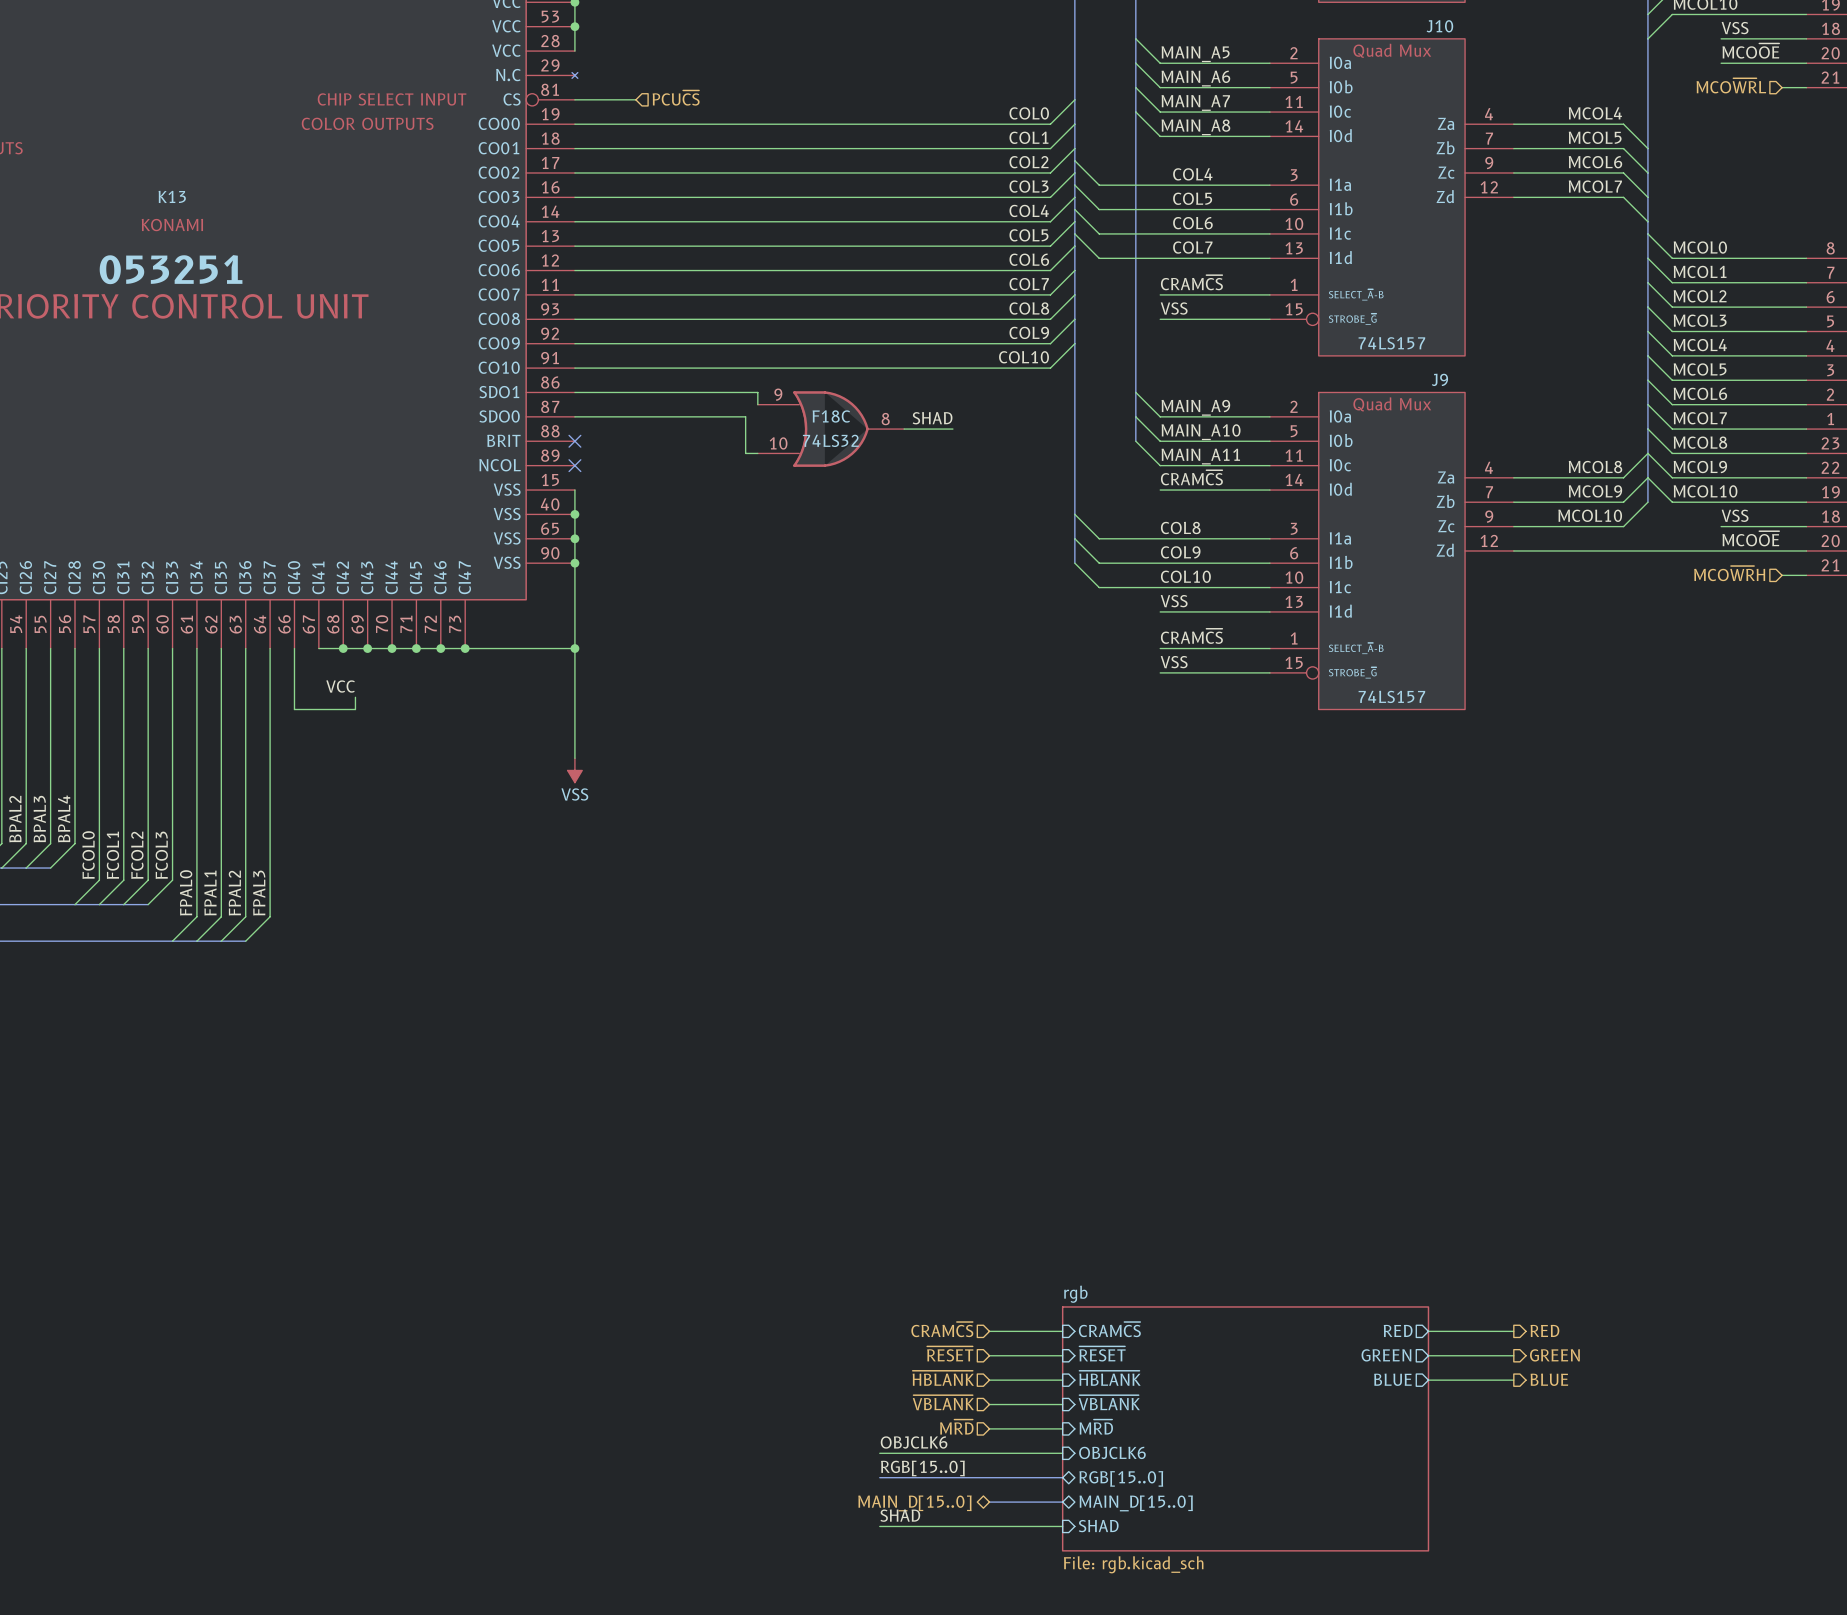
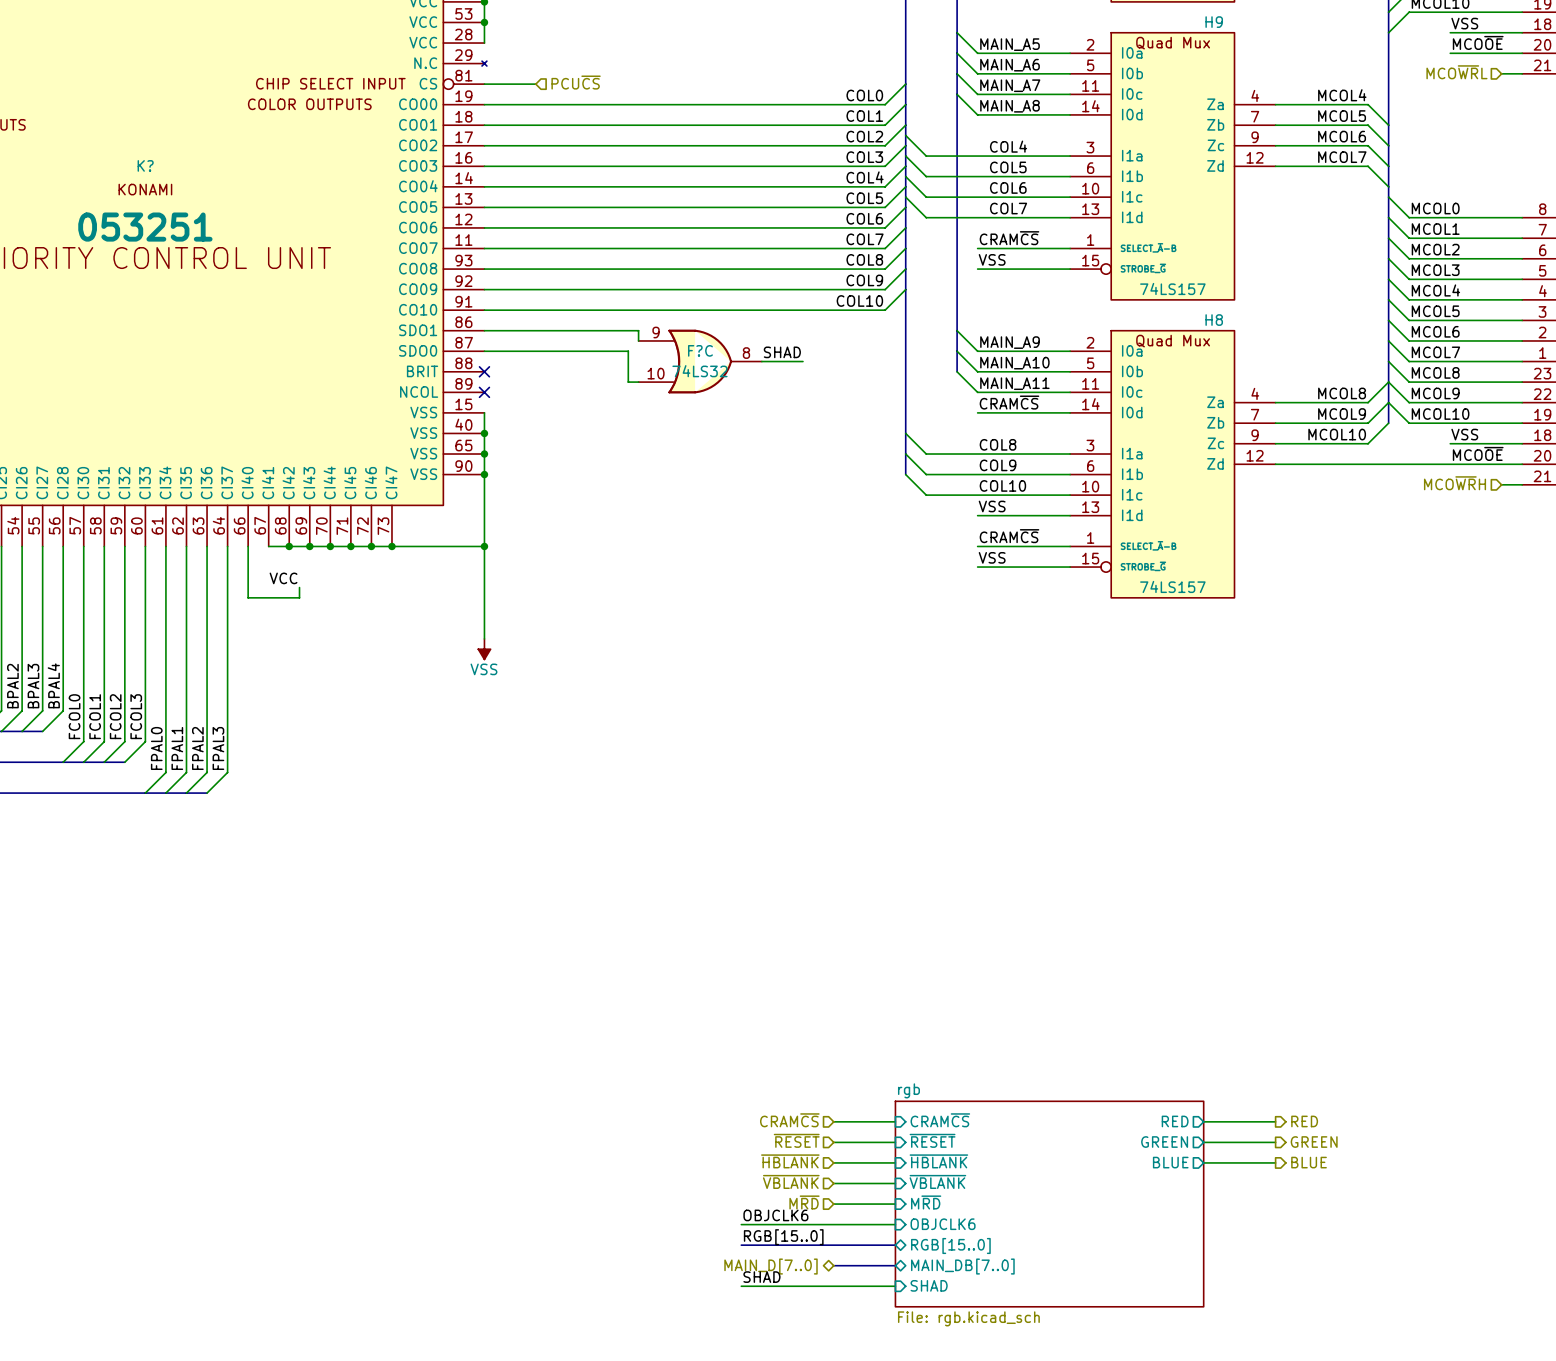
J10 name: J10 (1439, 26) -> H9 (1214, 22)
K13 name: K13 (172, 196) -> K? (145, 165)
J9 name: J9 (1439, 379) -> H8 (1214, 320)
F18C name: F18C (831, 416) -> F?C (700, 350)
hierarchical label: MAIN_D[15..0] (914, 1503) -> MAIN_D[7..0] (771, 1266)
sheet pin: MAIN_D[15..0] (1136, 1503) -> MAIN_DB[7..0] (962, 1266)

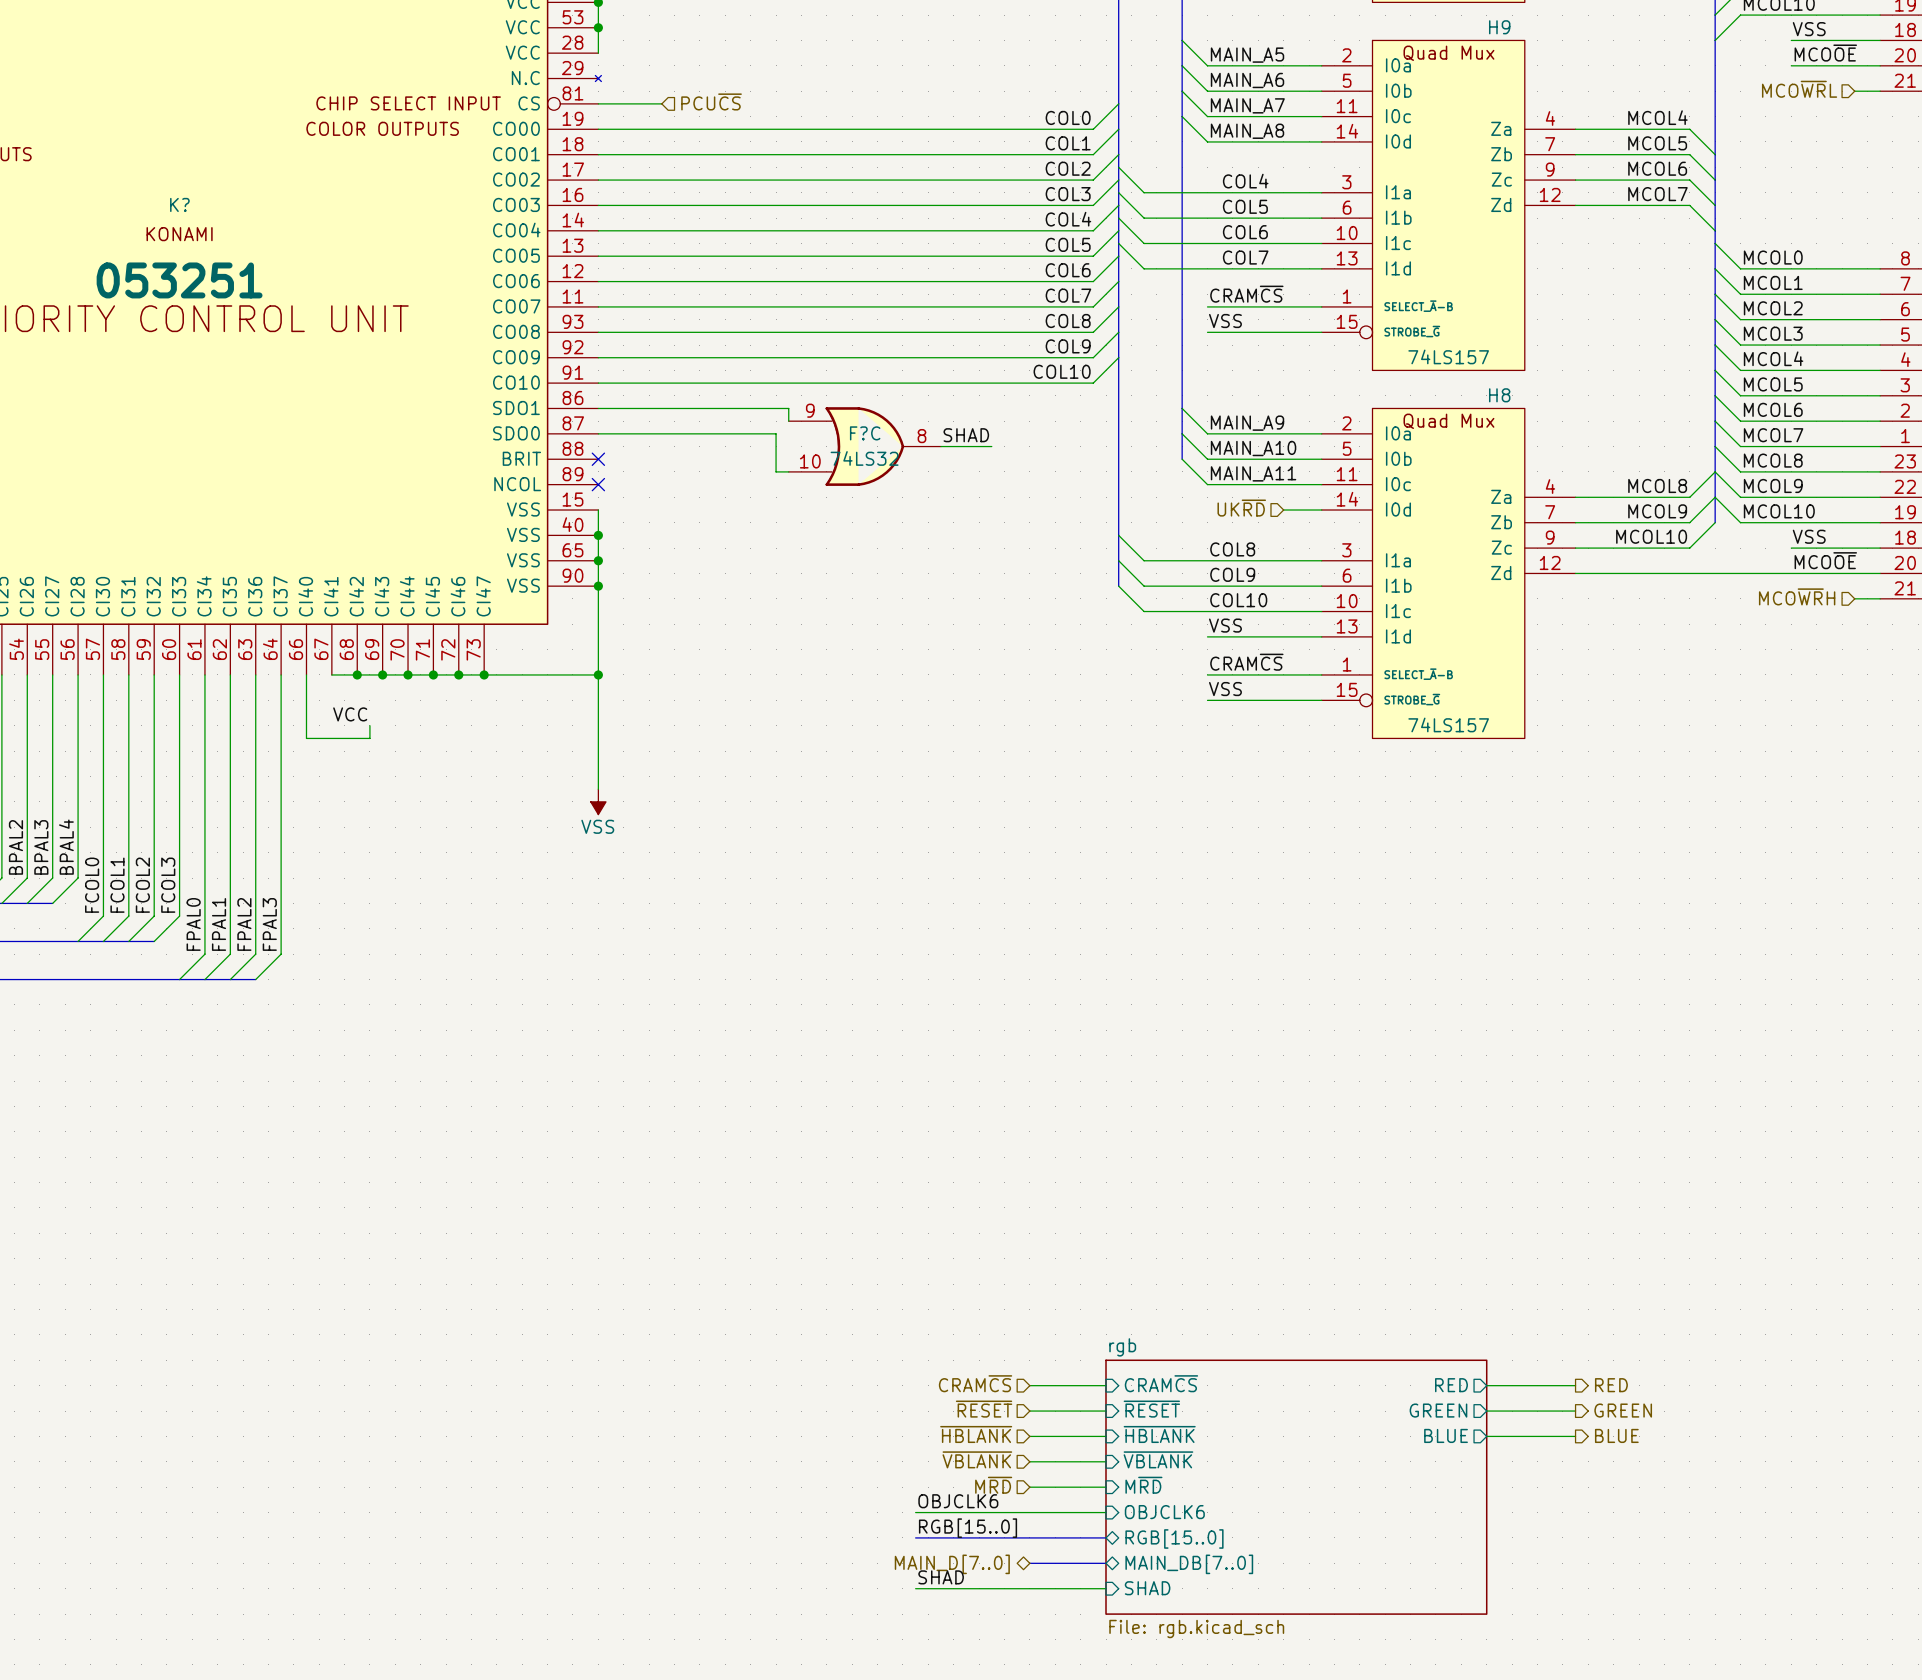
label: CRAM~{CS} (1009, 402) -> none
hierarchical label: none -> UK~{RD} (1241, 508)
wire: (977, 412) (1039, 412) -> none

